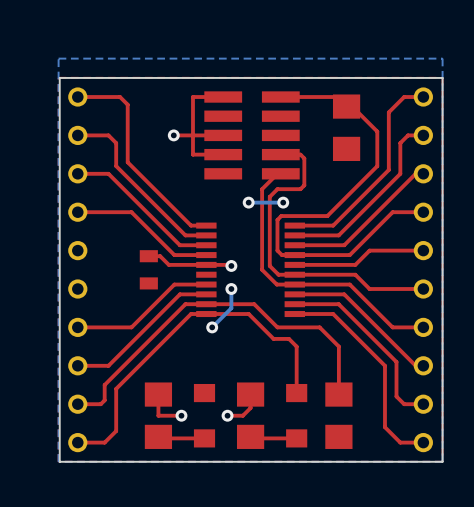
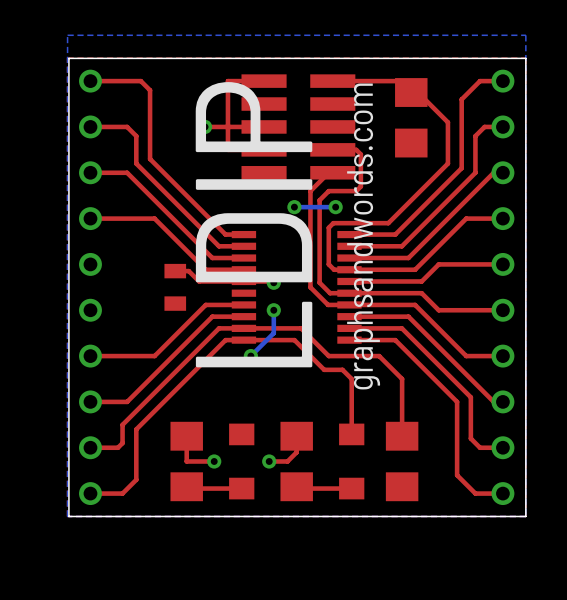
text: none -> LDIP (254, 224)
text: none -> graphsandwords.com (363, 236)

